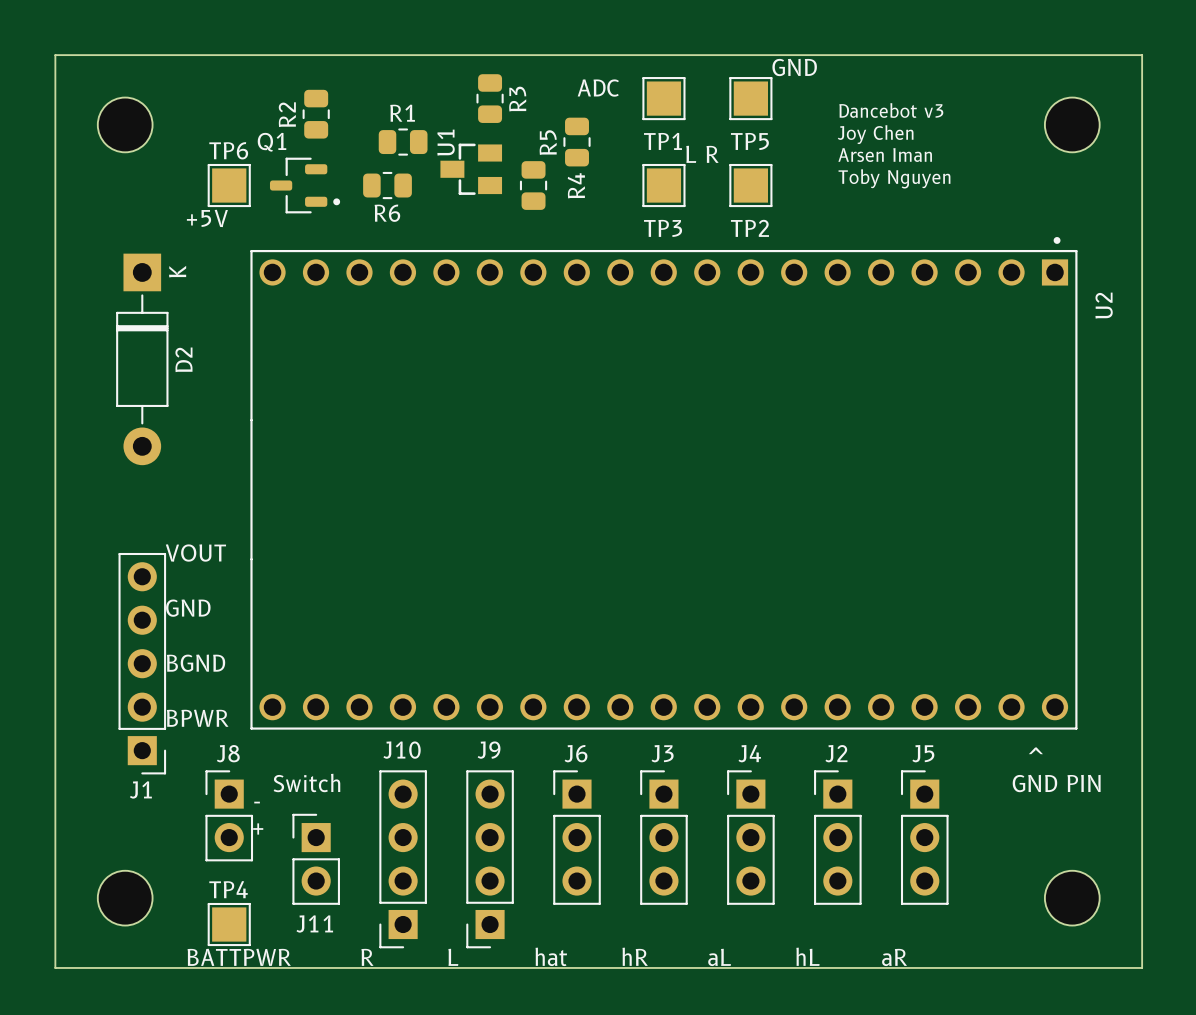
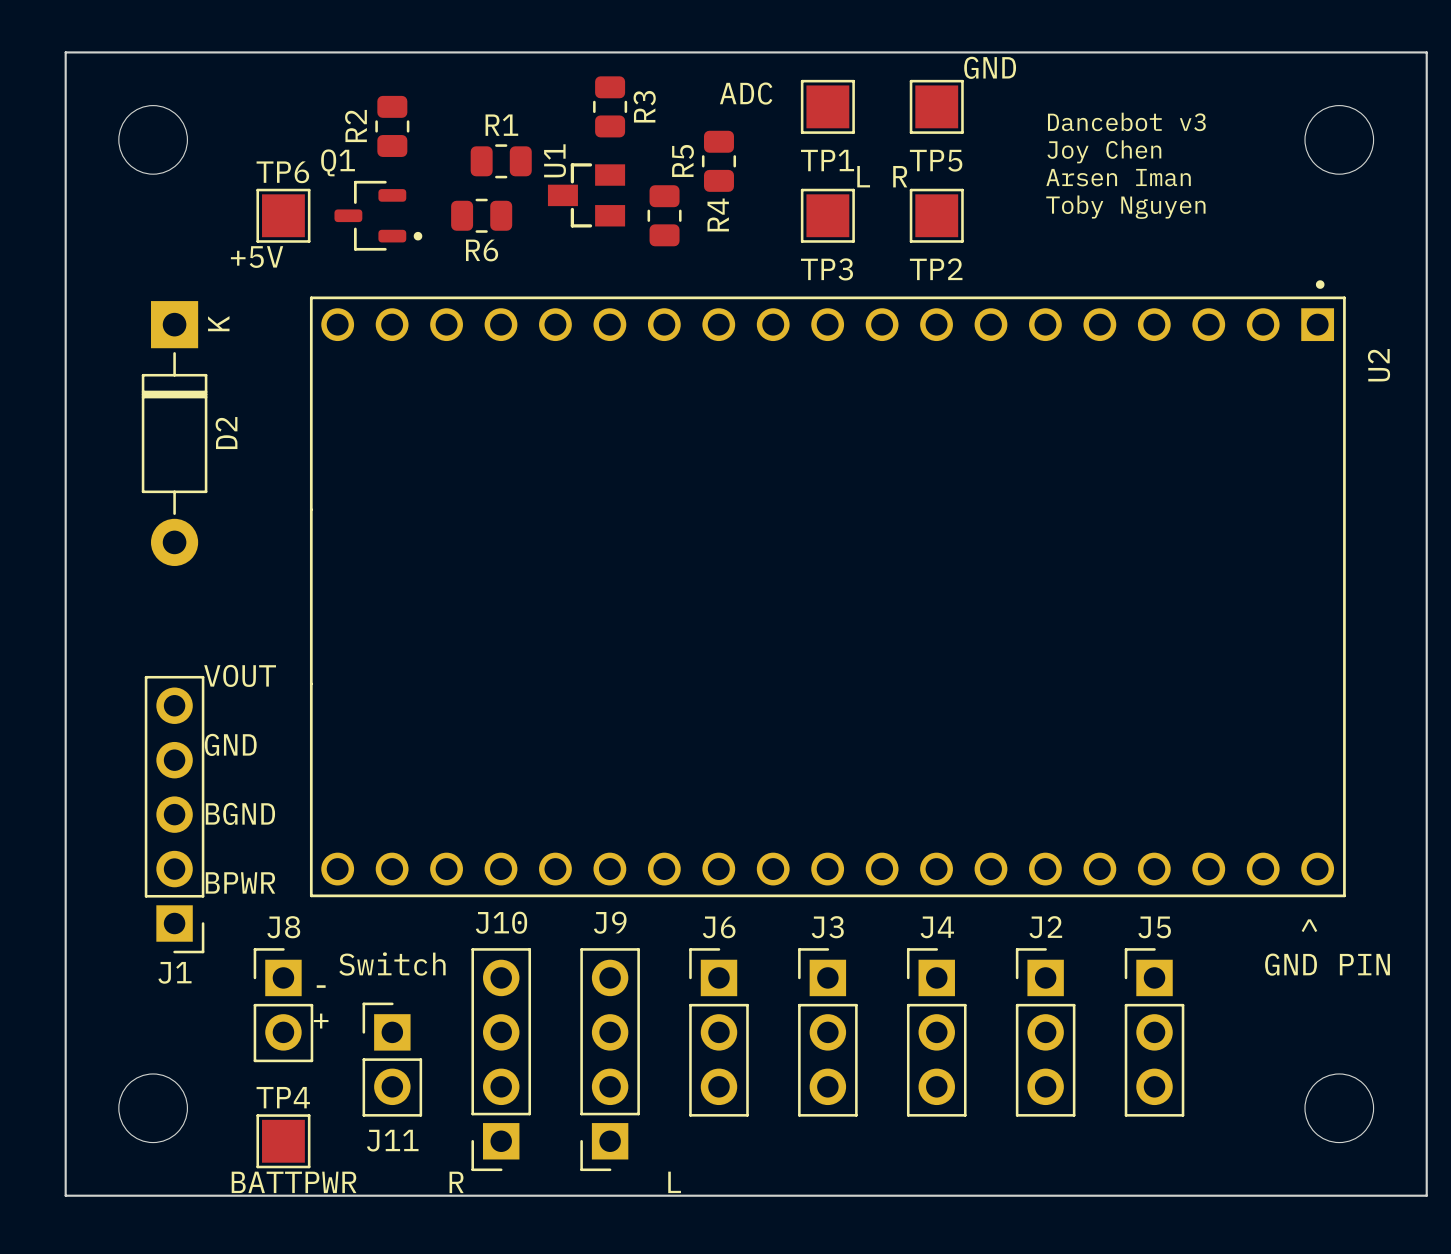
text: hat (551, 956) -> L (674, 1182)
text: hR (635, 956) -> none
text: hL (807, 956) -> none
text: L (453, 957) -> none
text: aL (719, 957) -> none
text: aR (894, 957) -> none

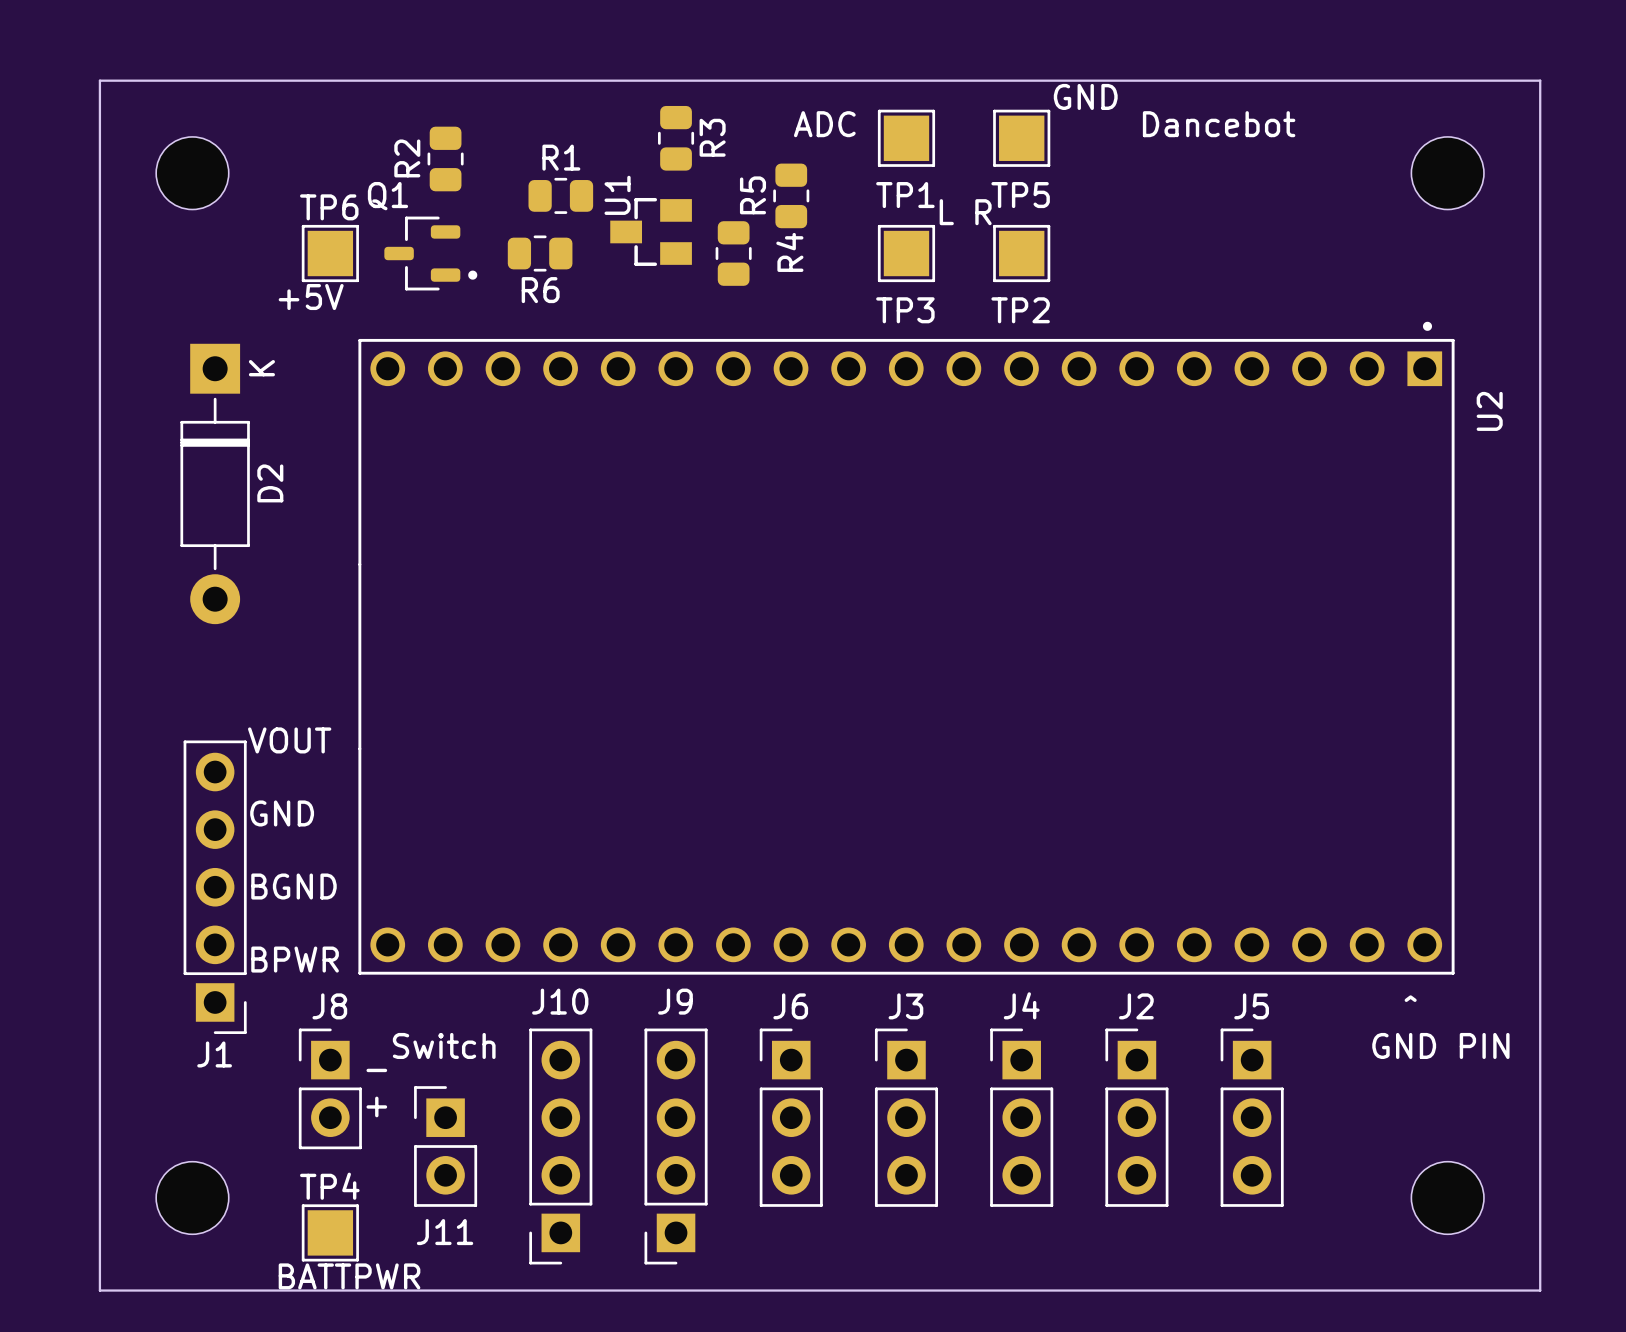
text: Dancebot v3 (1126, 121) -> Dancebot (1219, 124)
text: Joy Chen (1104, 151) -> none
text: Arsen Iman (1118, 177) -> none
text: Toby Nguyen (1125, 207) -> none
text: R (456, 1182) -> none
text: L (674, 1182) -> none

